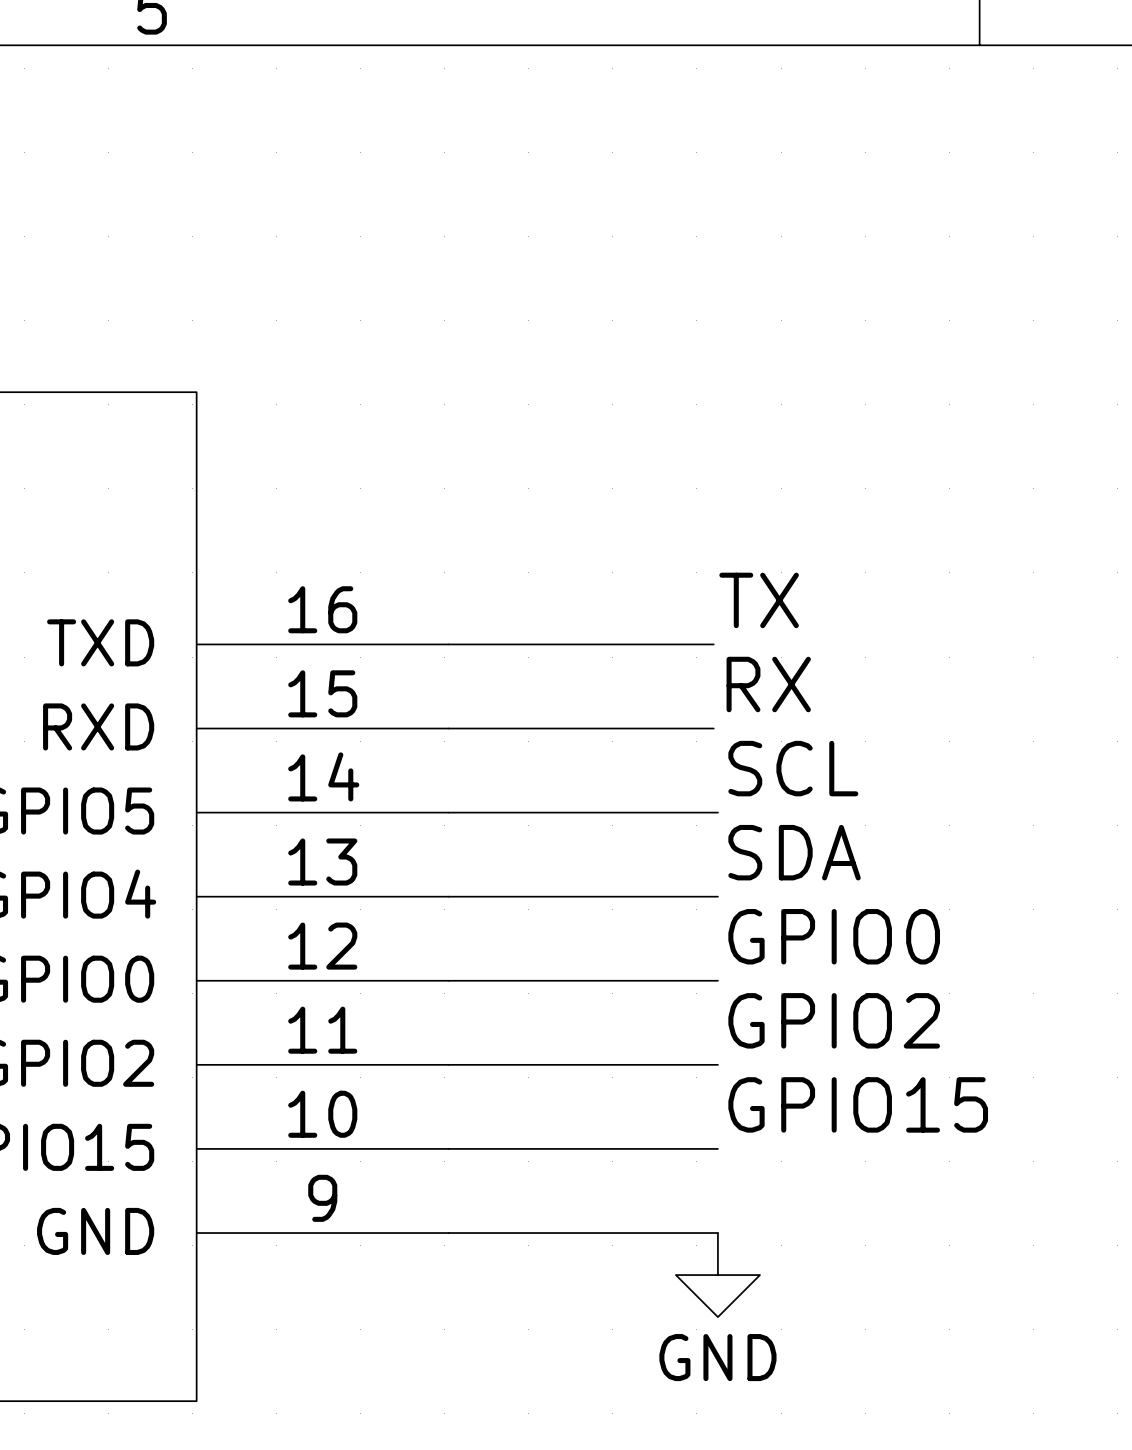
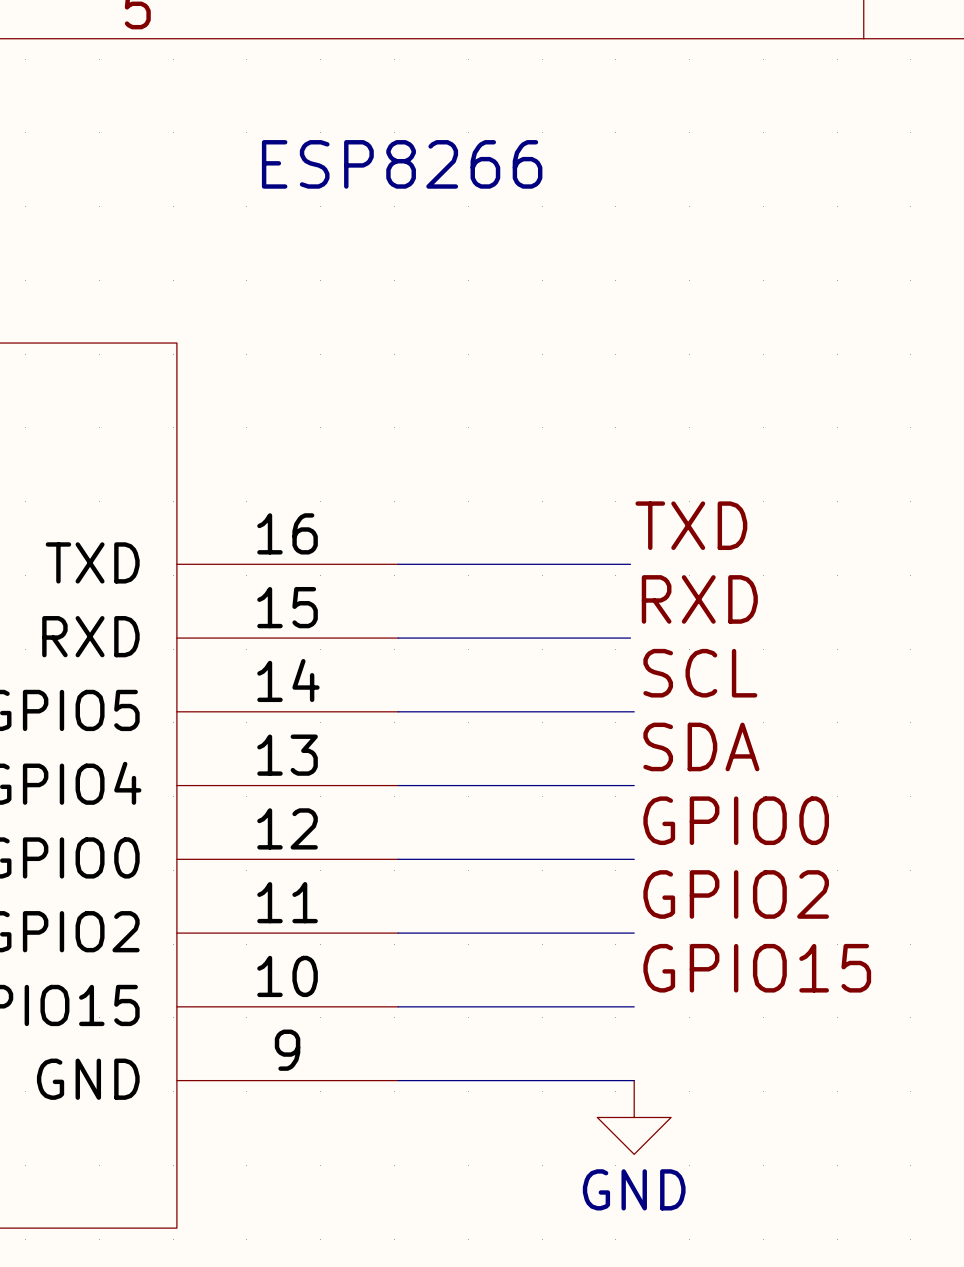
text: none -> ESP8266 (402, 164)
label: TX (759, 600) -> TXD (691, 525)
label: RX (768, 684) -> RXD (699, 599)

